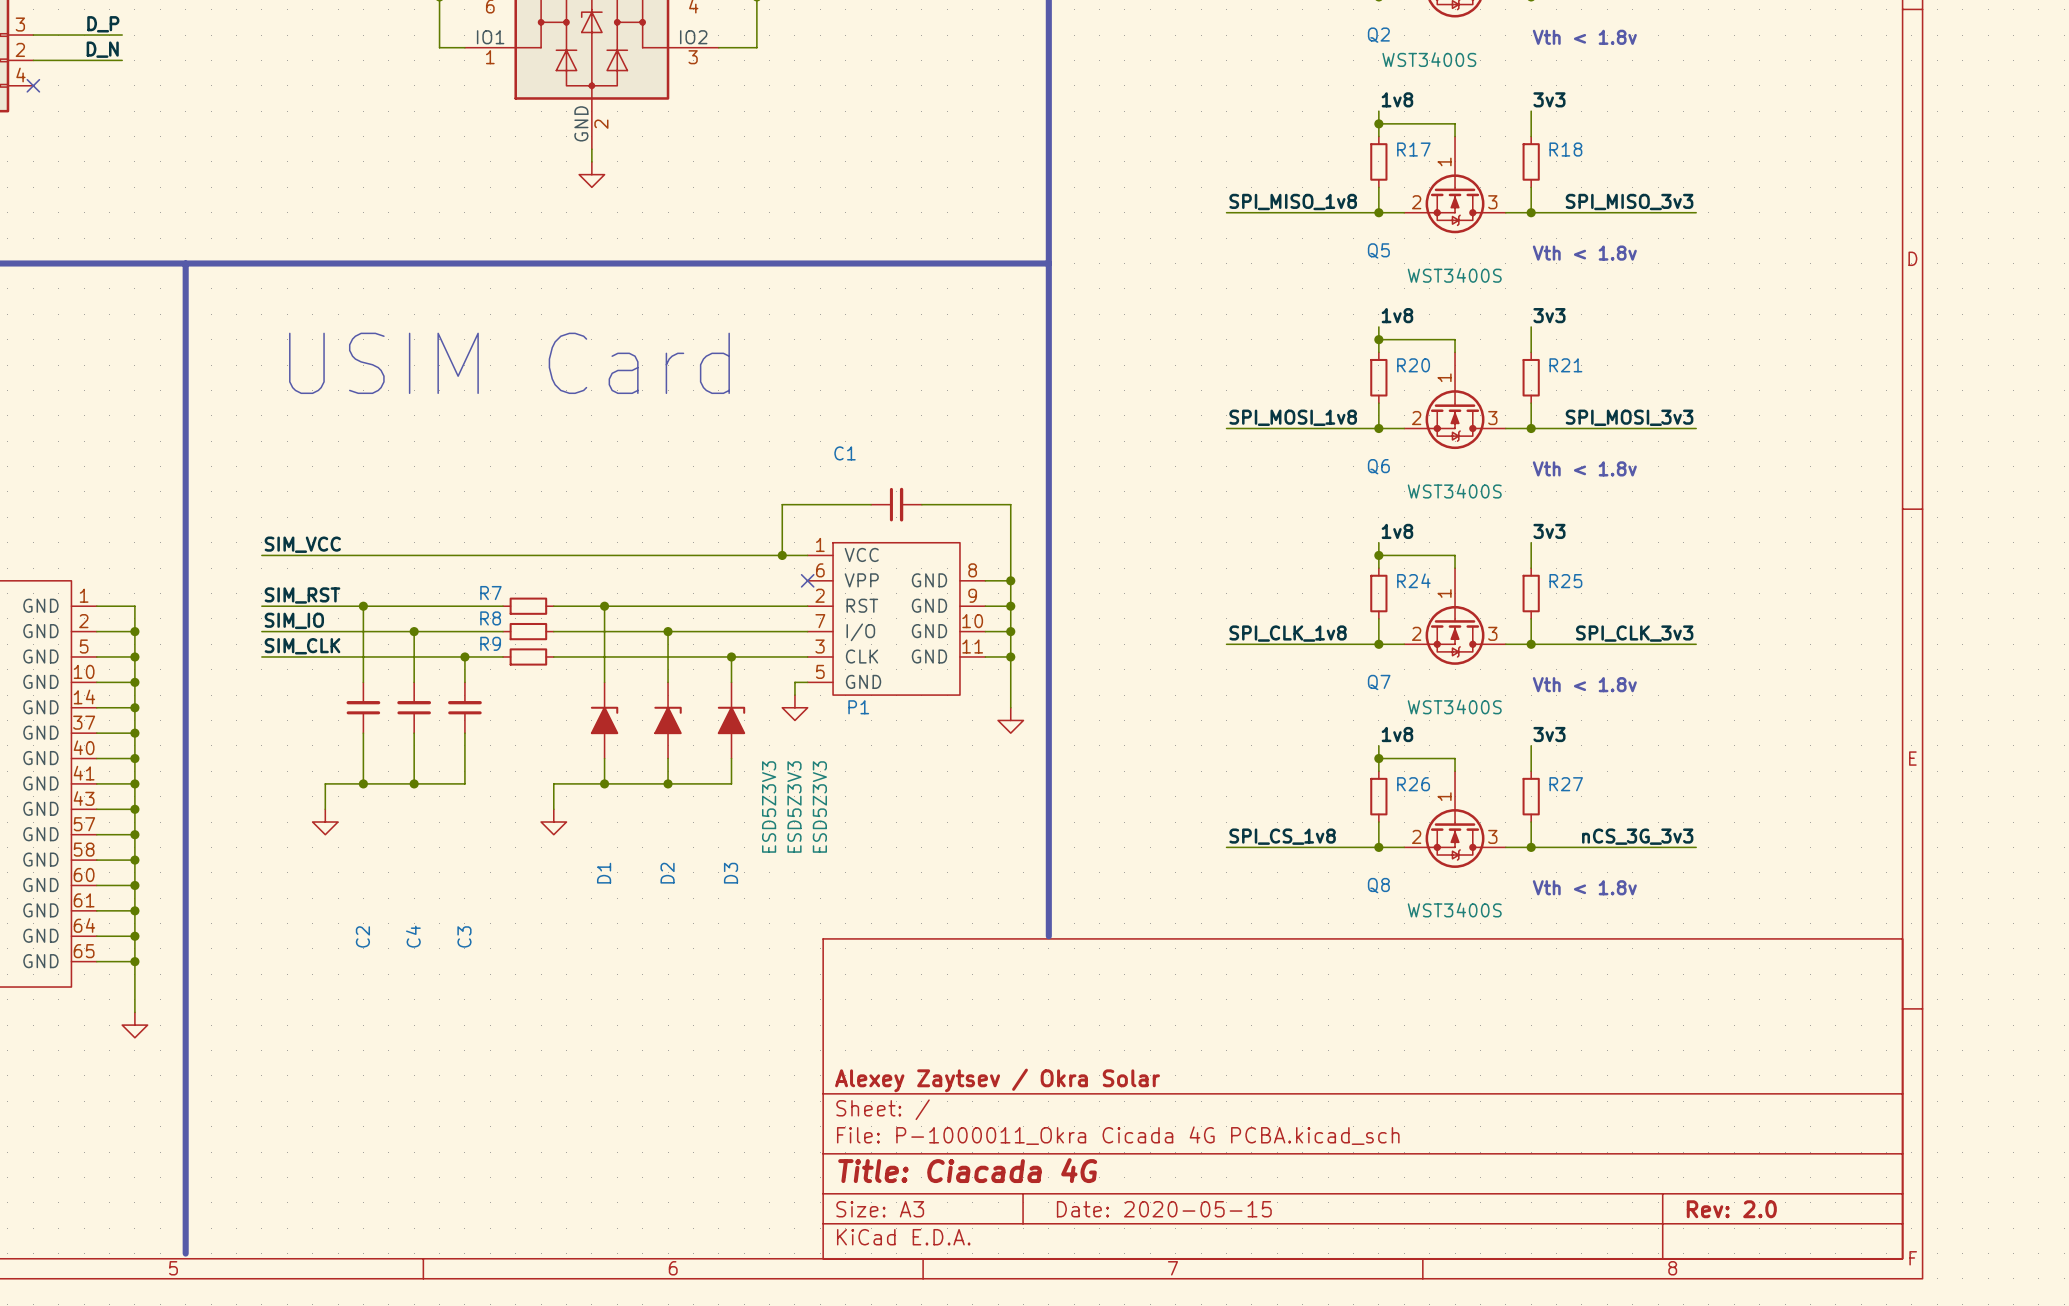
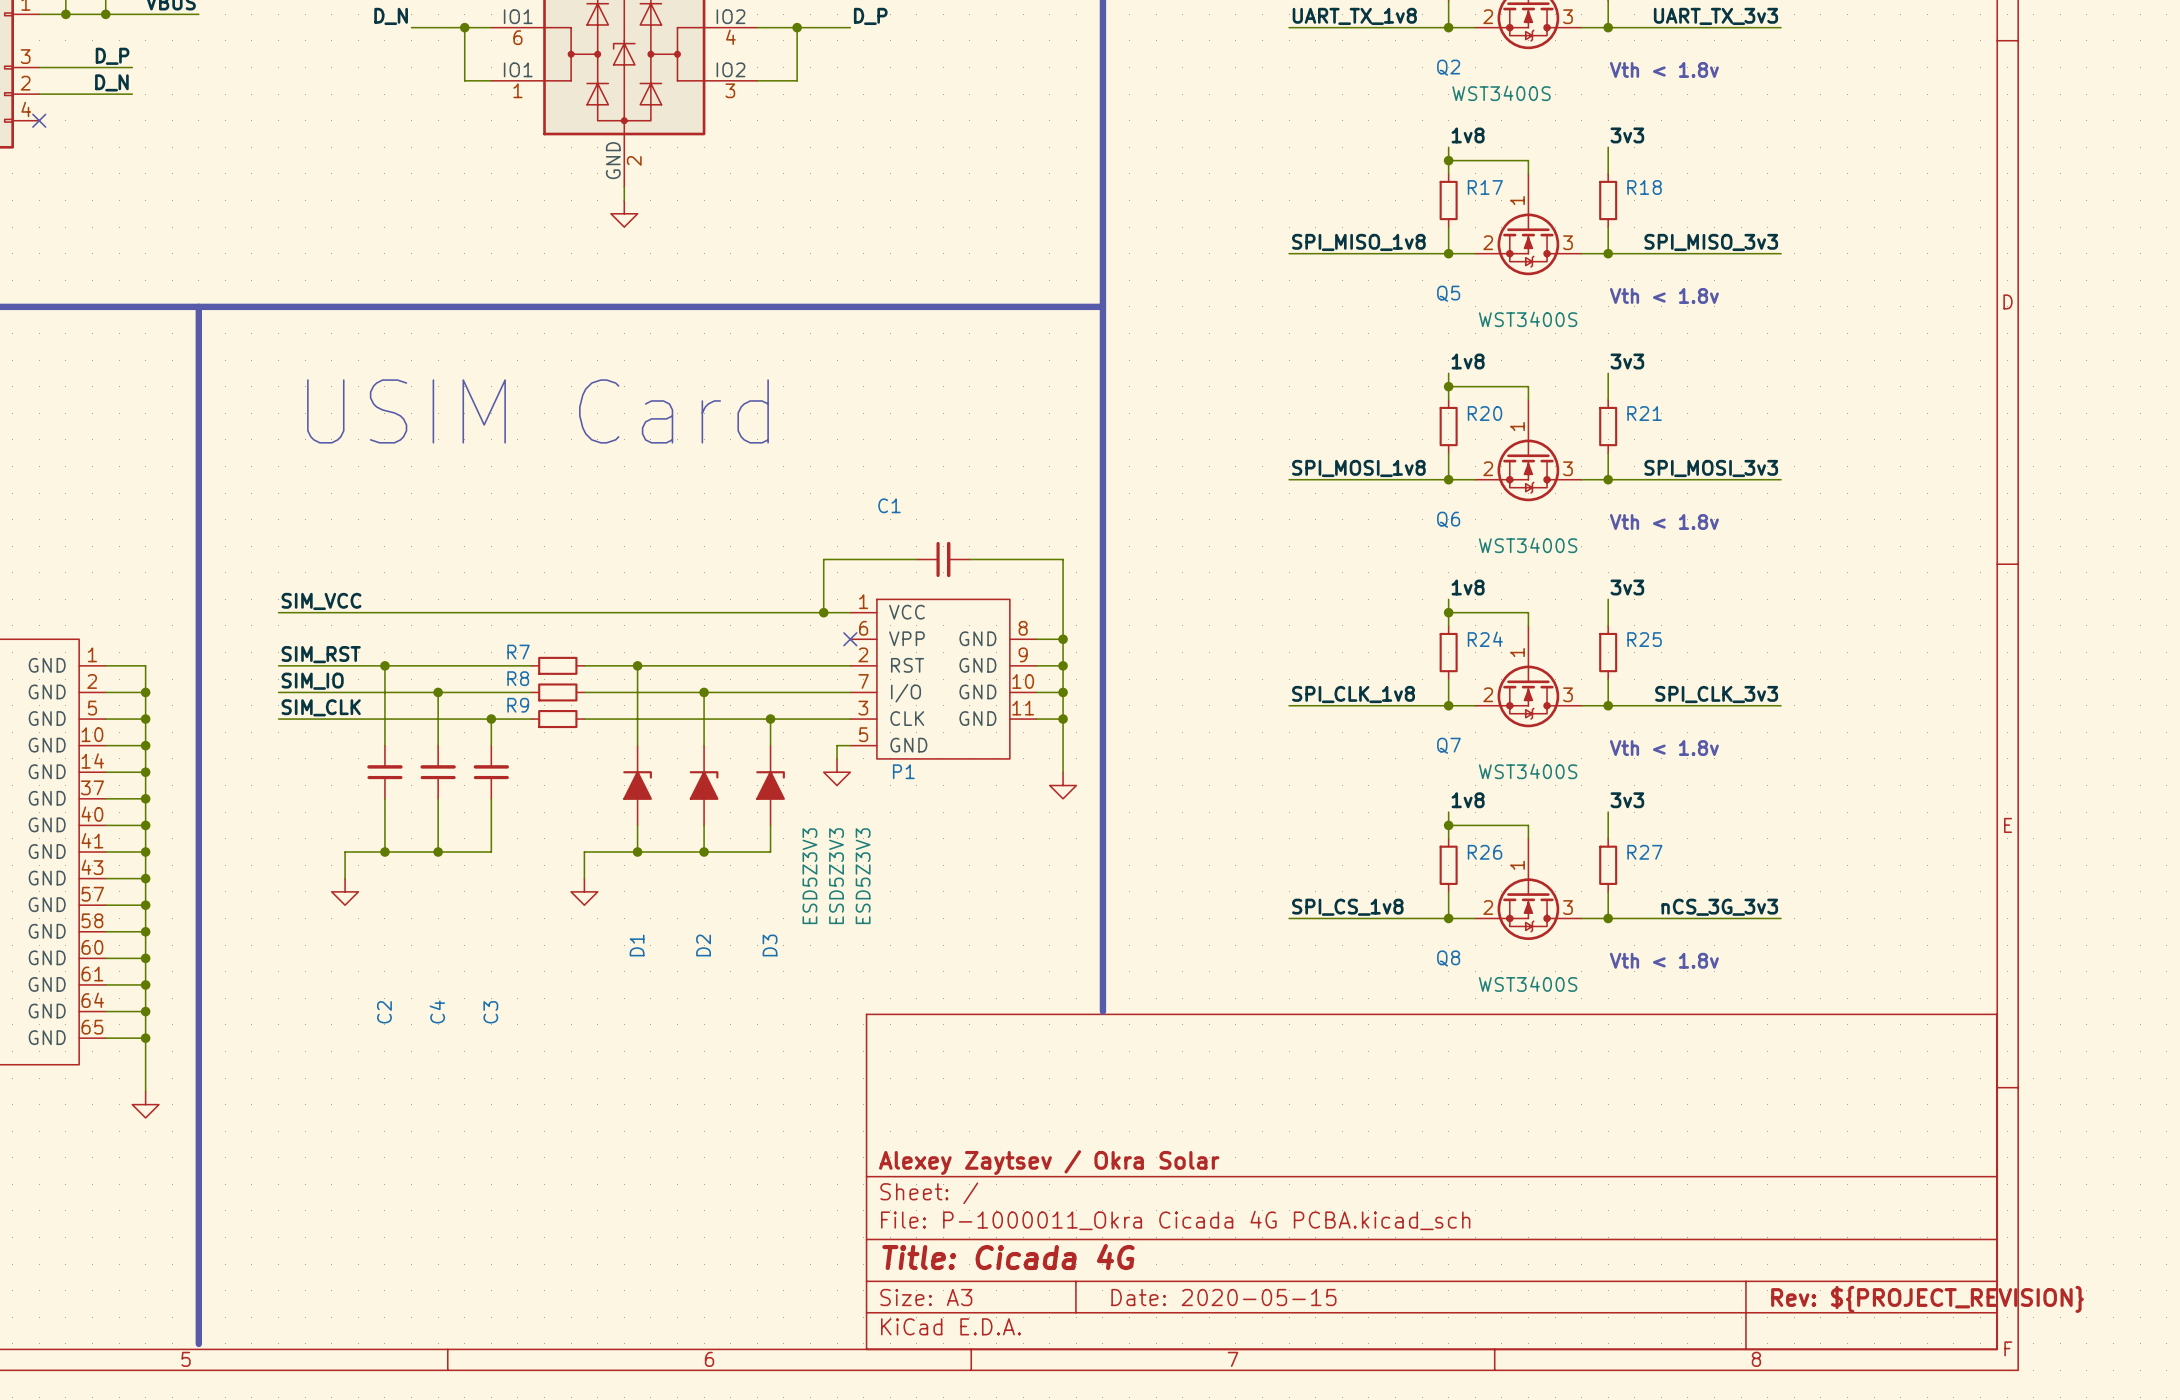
title block: Title: Ciacada 4G (967, 1170) -> Title: Cicada 4G (1008, 1257)
title block: Rev: 2.0 (1731, 1209) -> Rev: ${PROJECT_REVISION} (1927, 1299)

